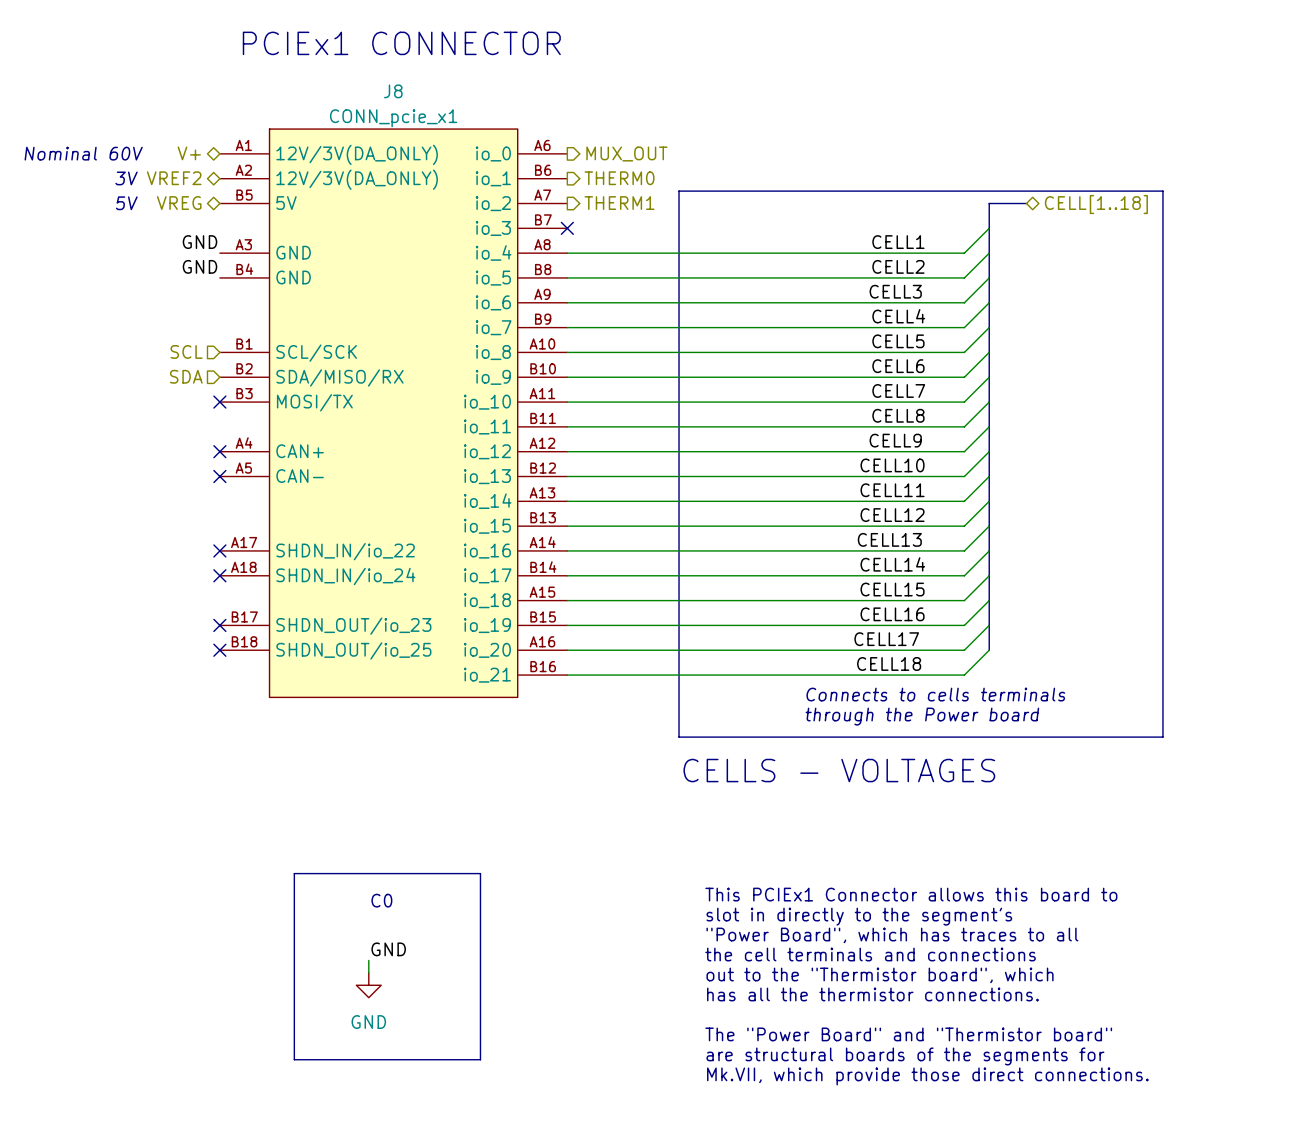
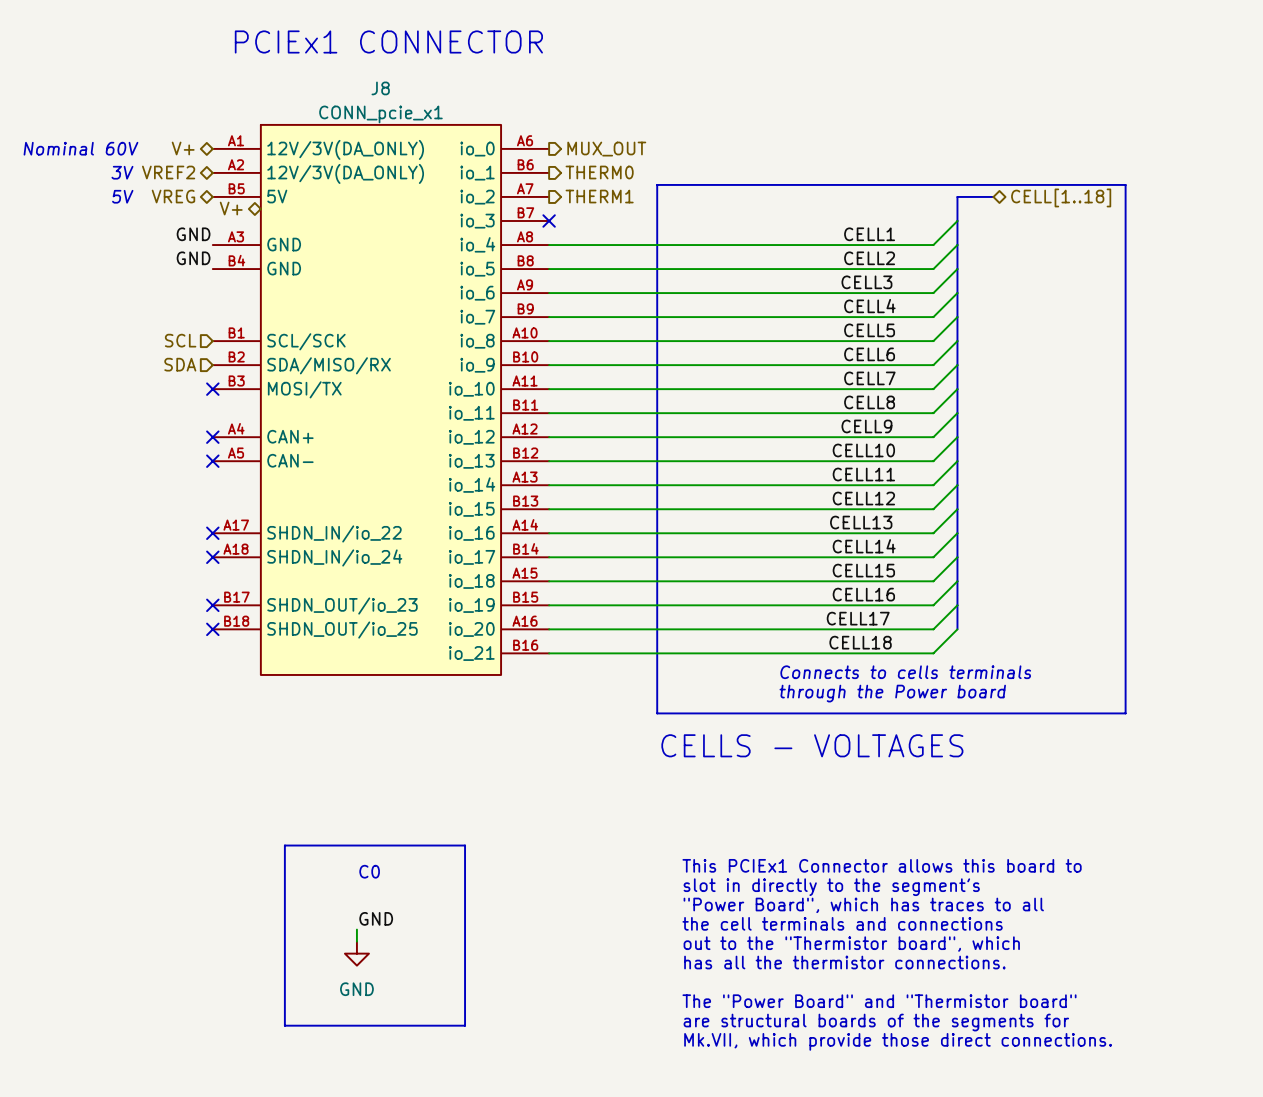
hierarchical label: none -> V+ (231, 208)

